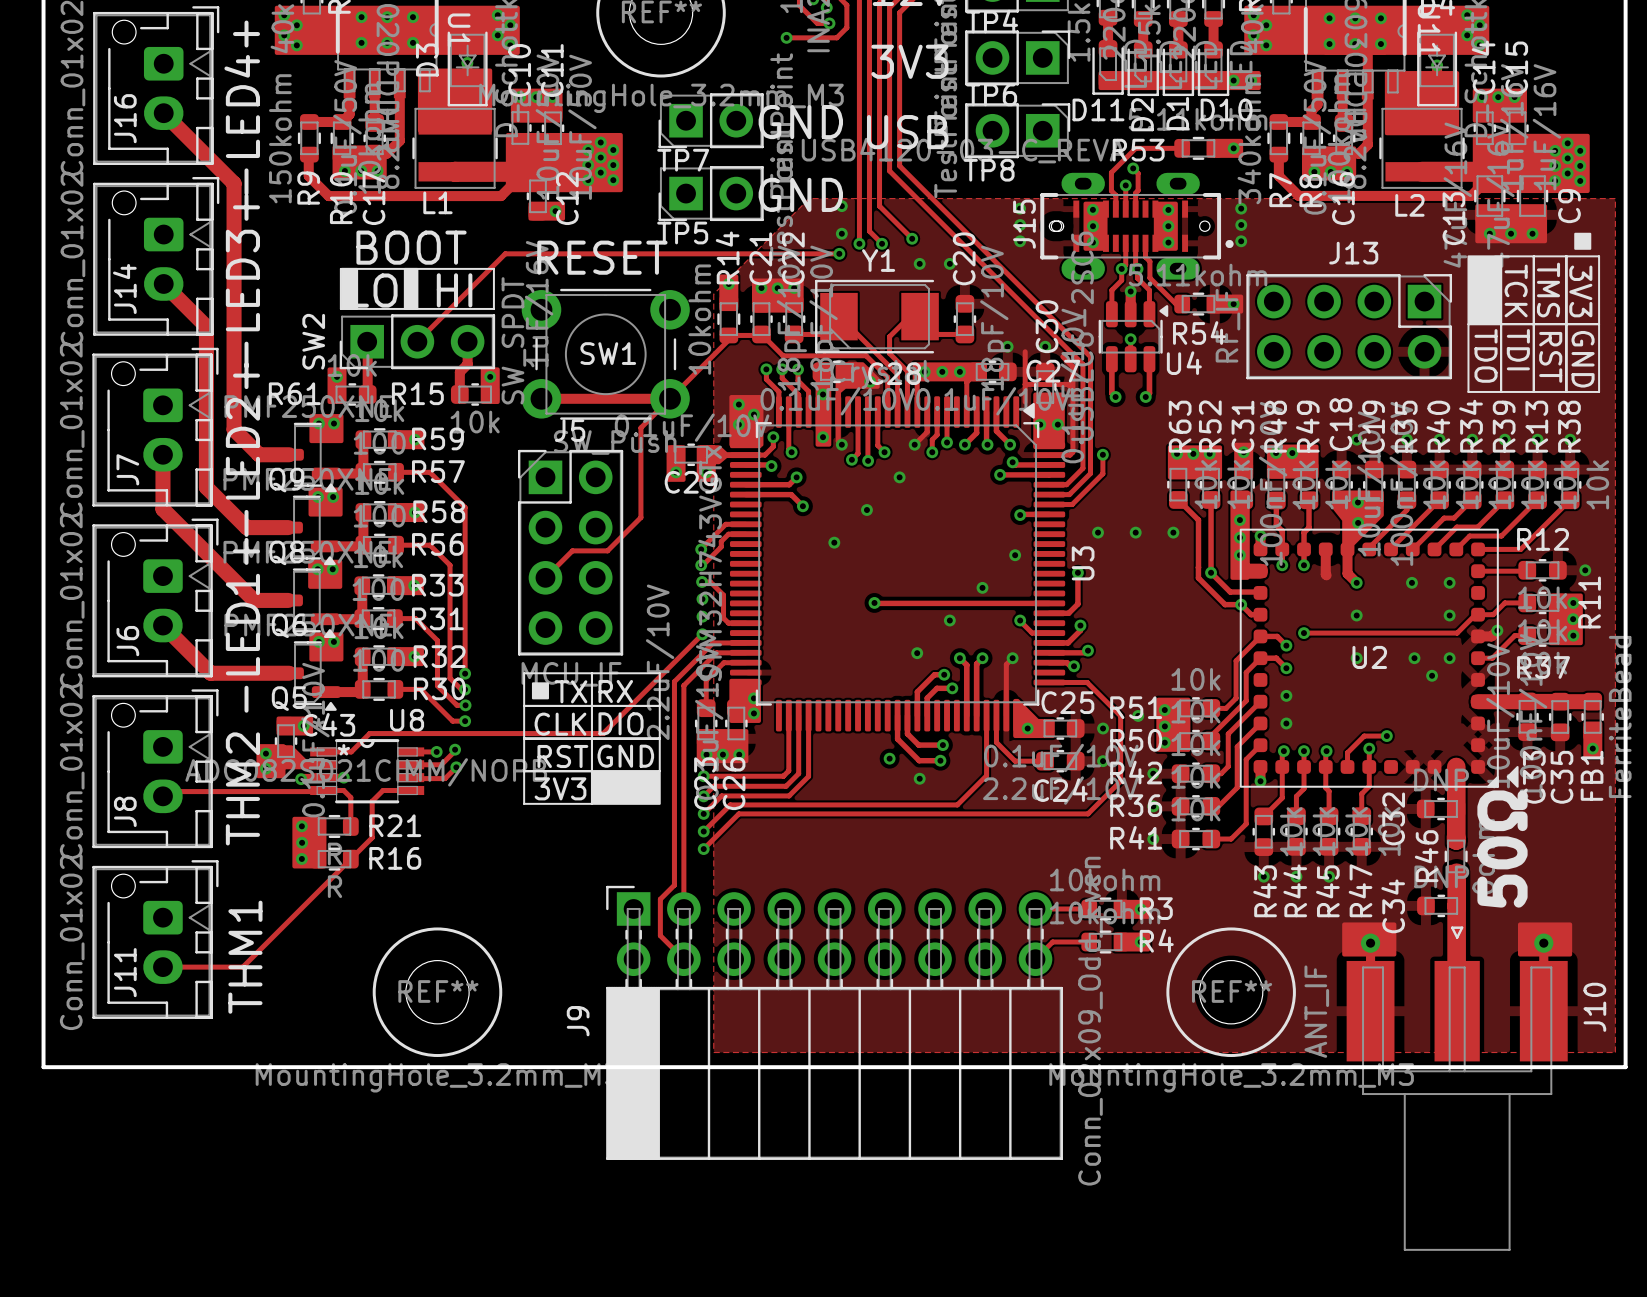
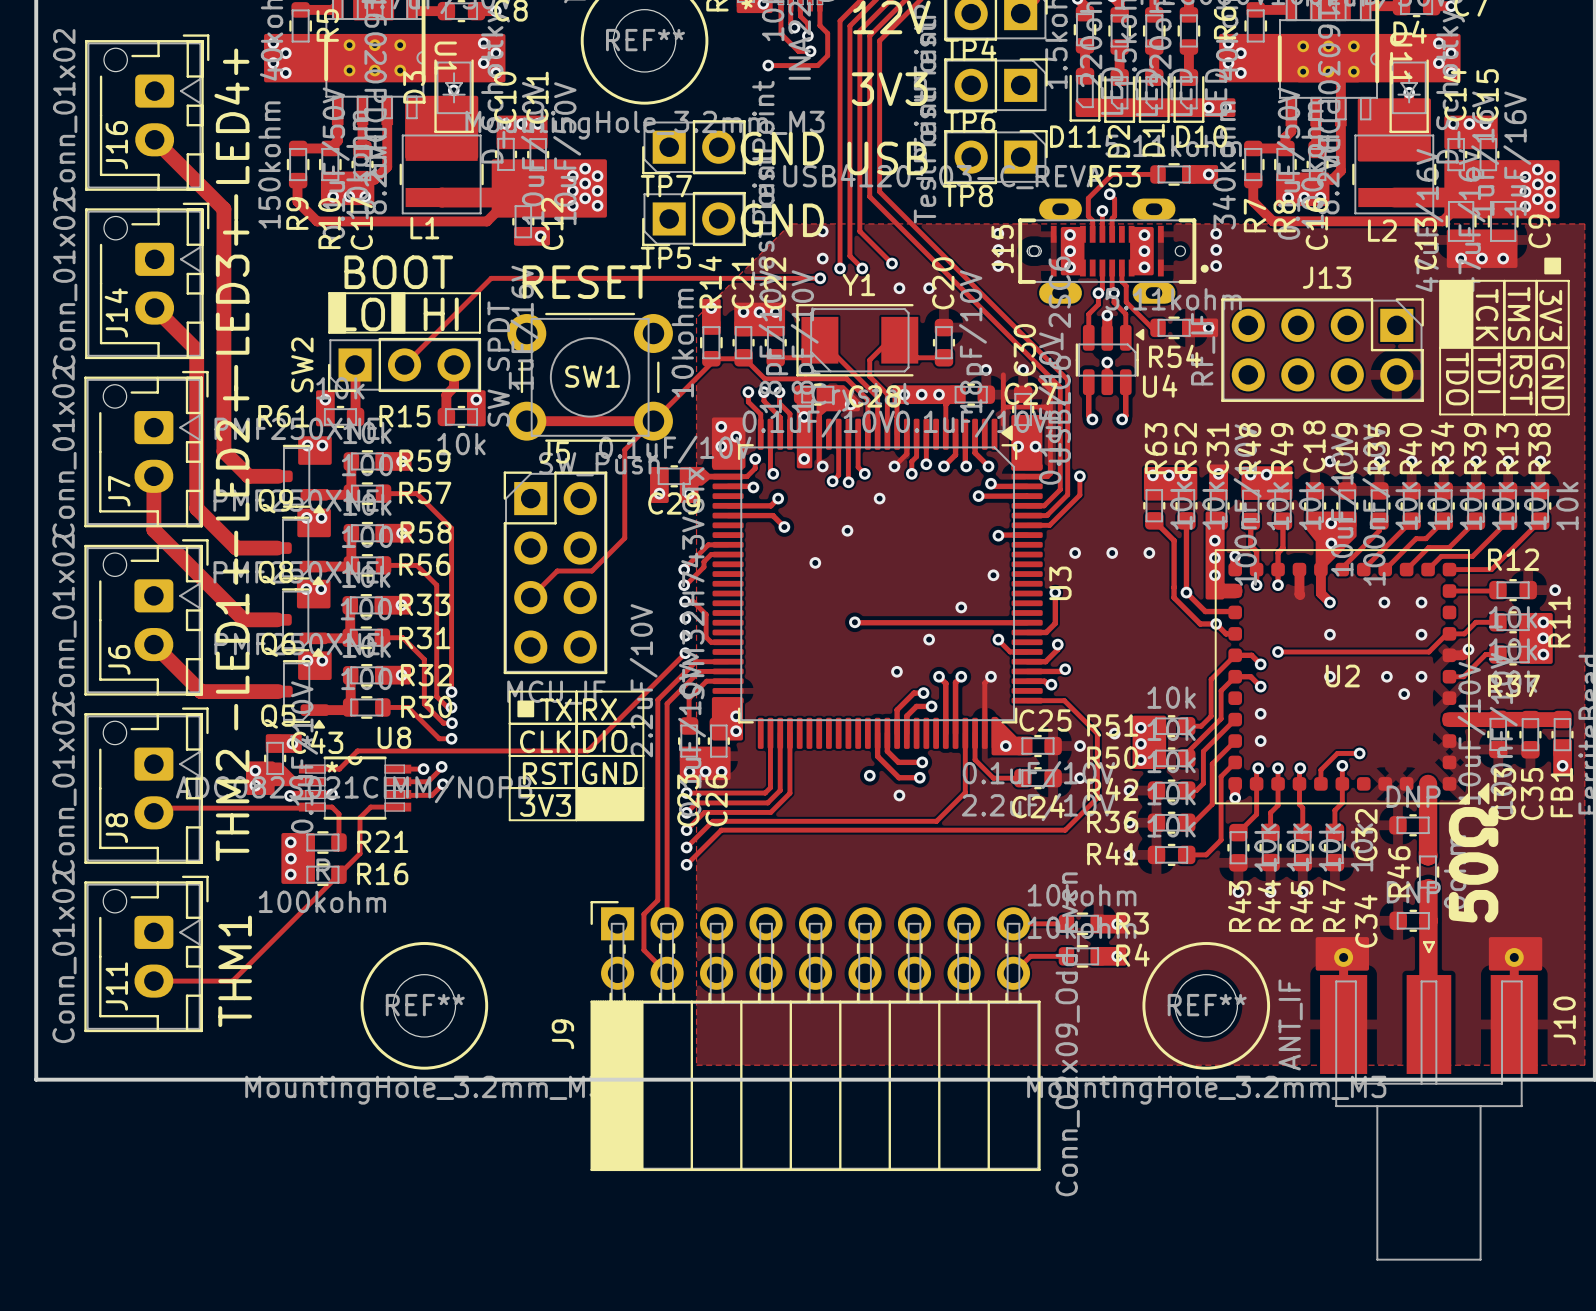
R16 value: R (334, 886) -> 100kohm (322, 901)

